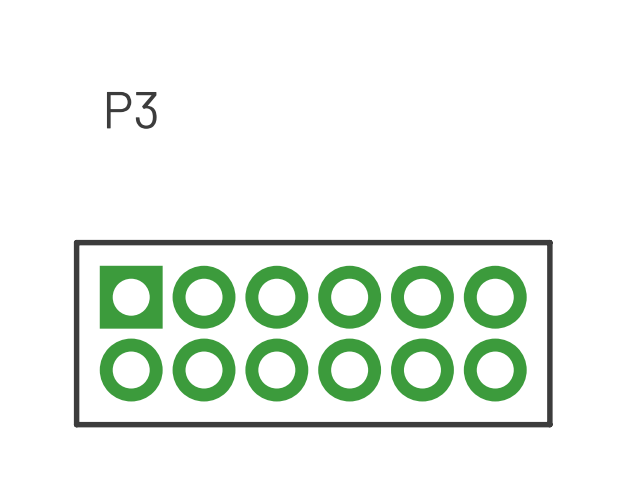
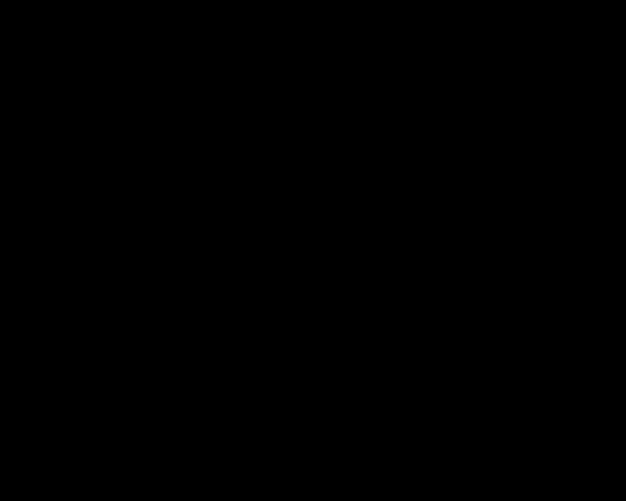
P3: (313, 333) -> none

